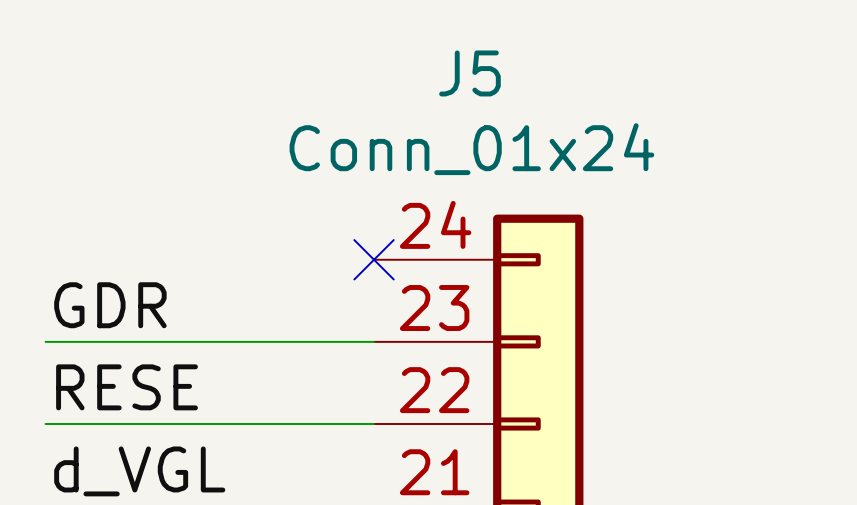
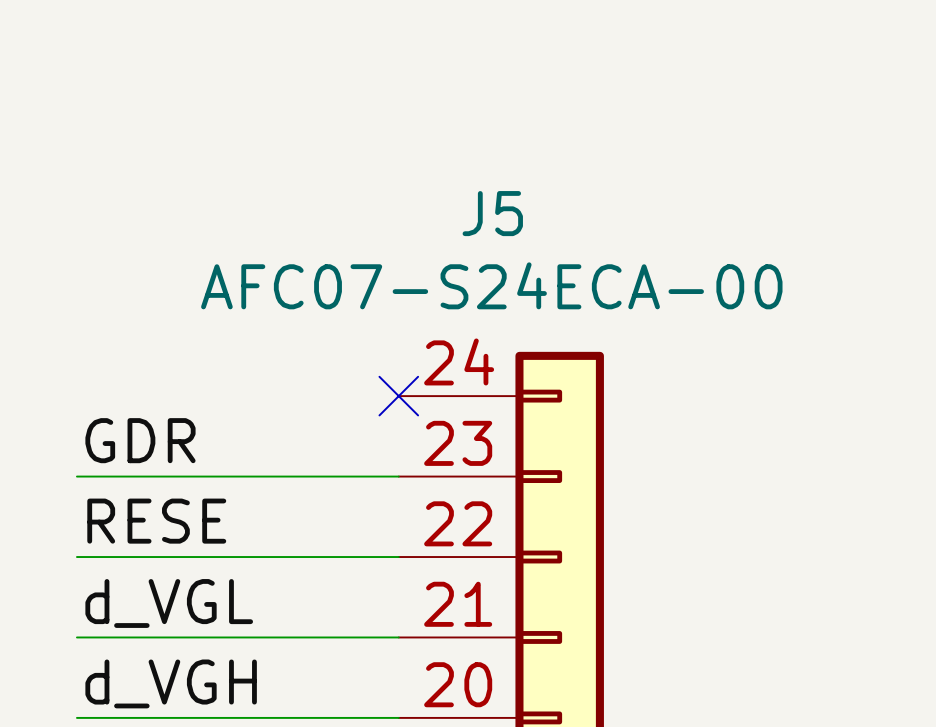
J5 value: Conn_01x24 (471, 149) -> AFC07-S24ECA-00 (491, 285)

